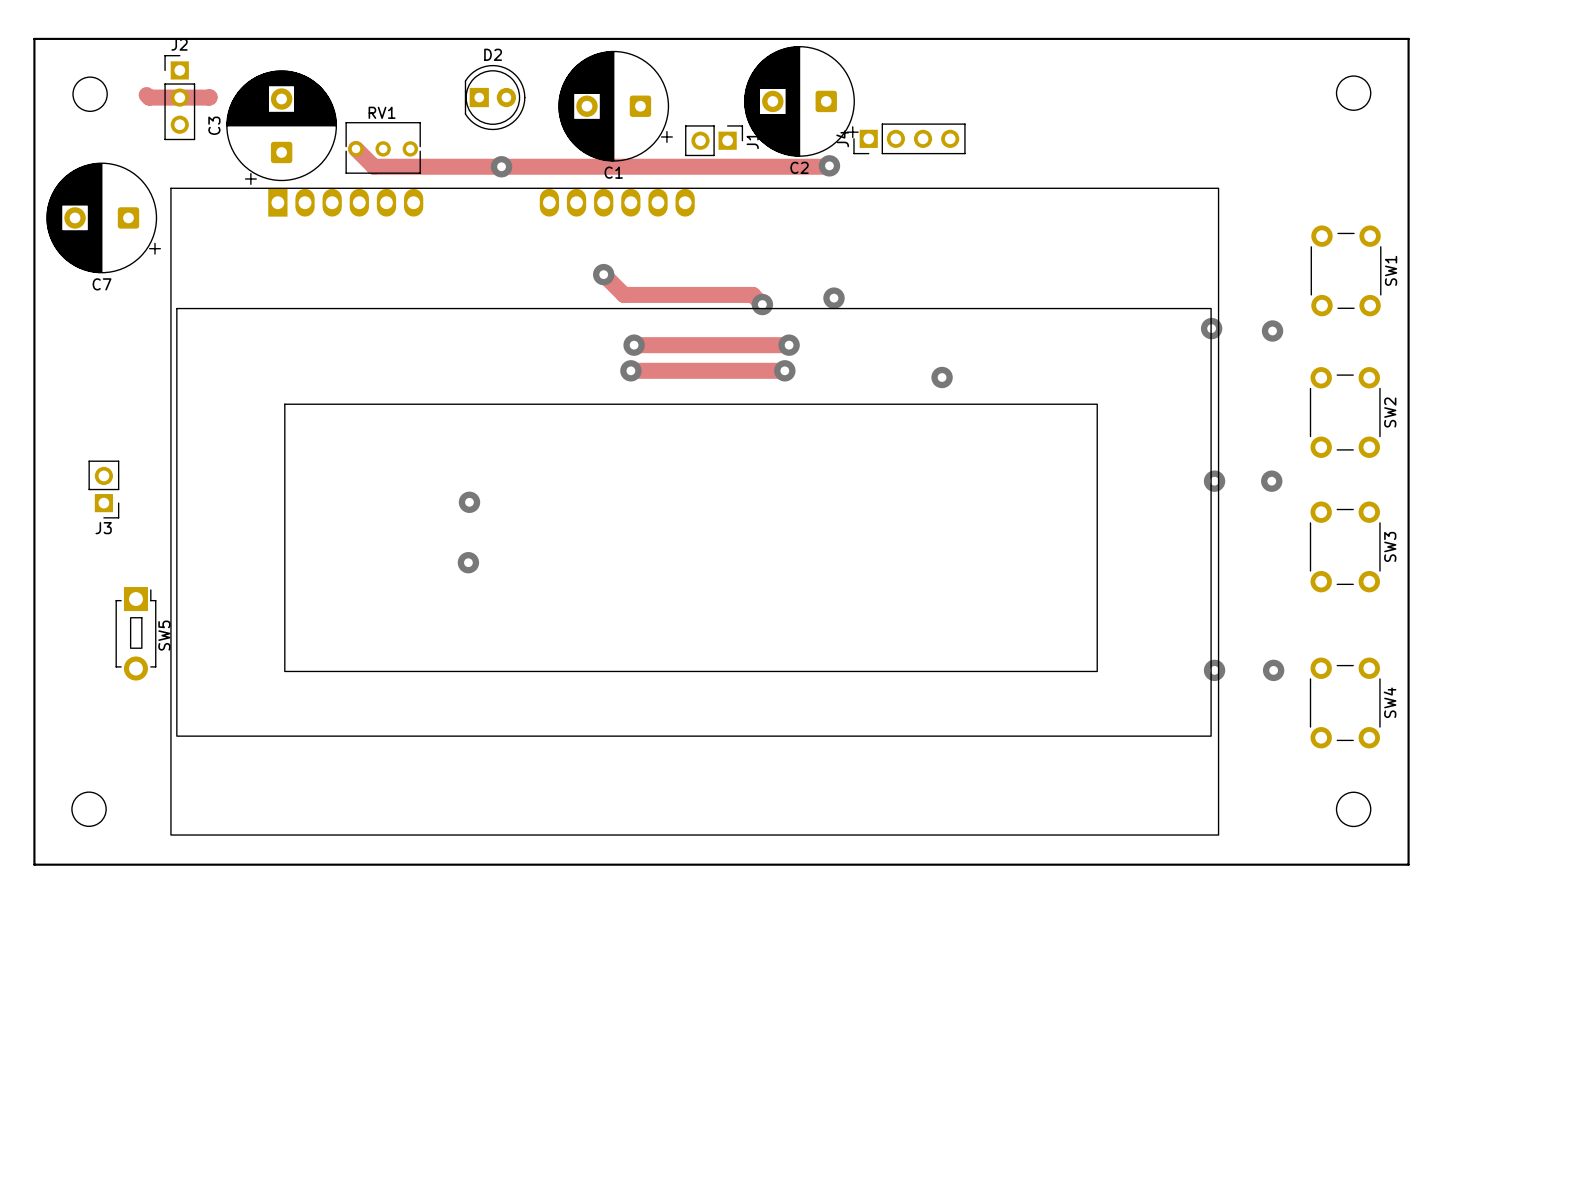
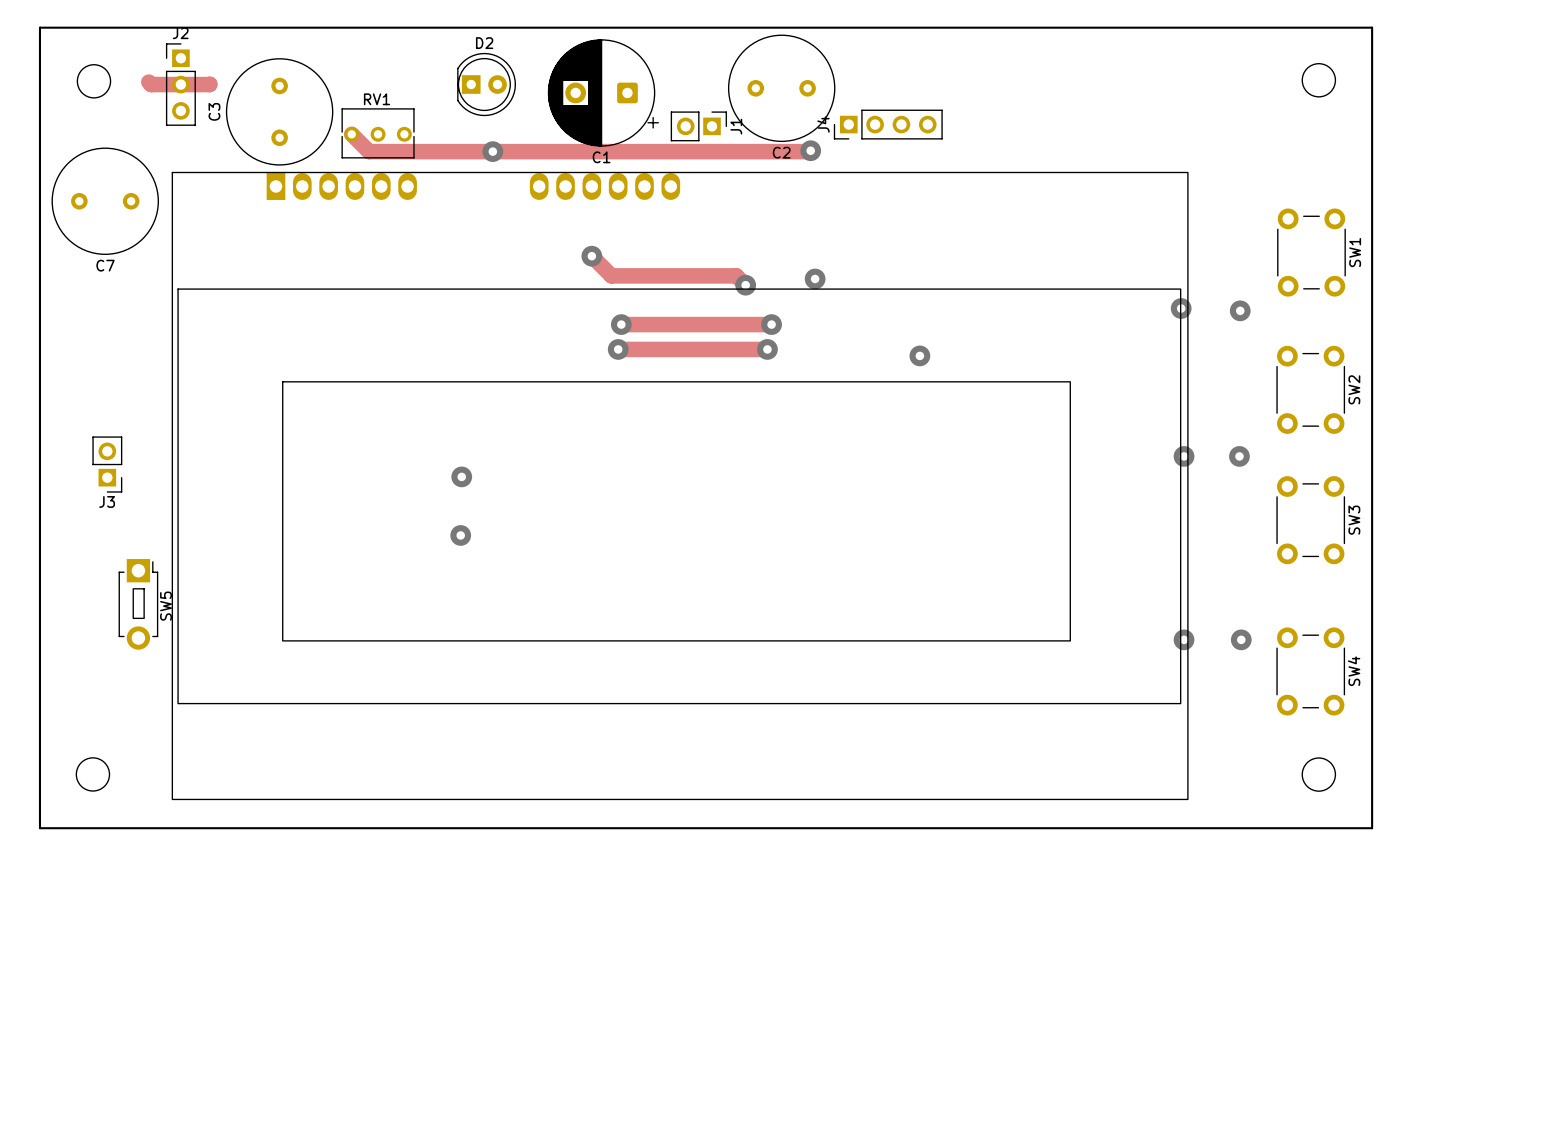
C2 footprint: [744, 46, 859, 157] -> [728, 34, 836, 142]
C3 footprint: [226, 70, 337, 185] -> [225, 58, 334, 166]
C7 footprint: [46, 162, 161, 274] -> [51, 147, 159, 255]

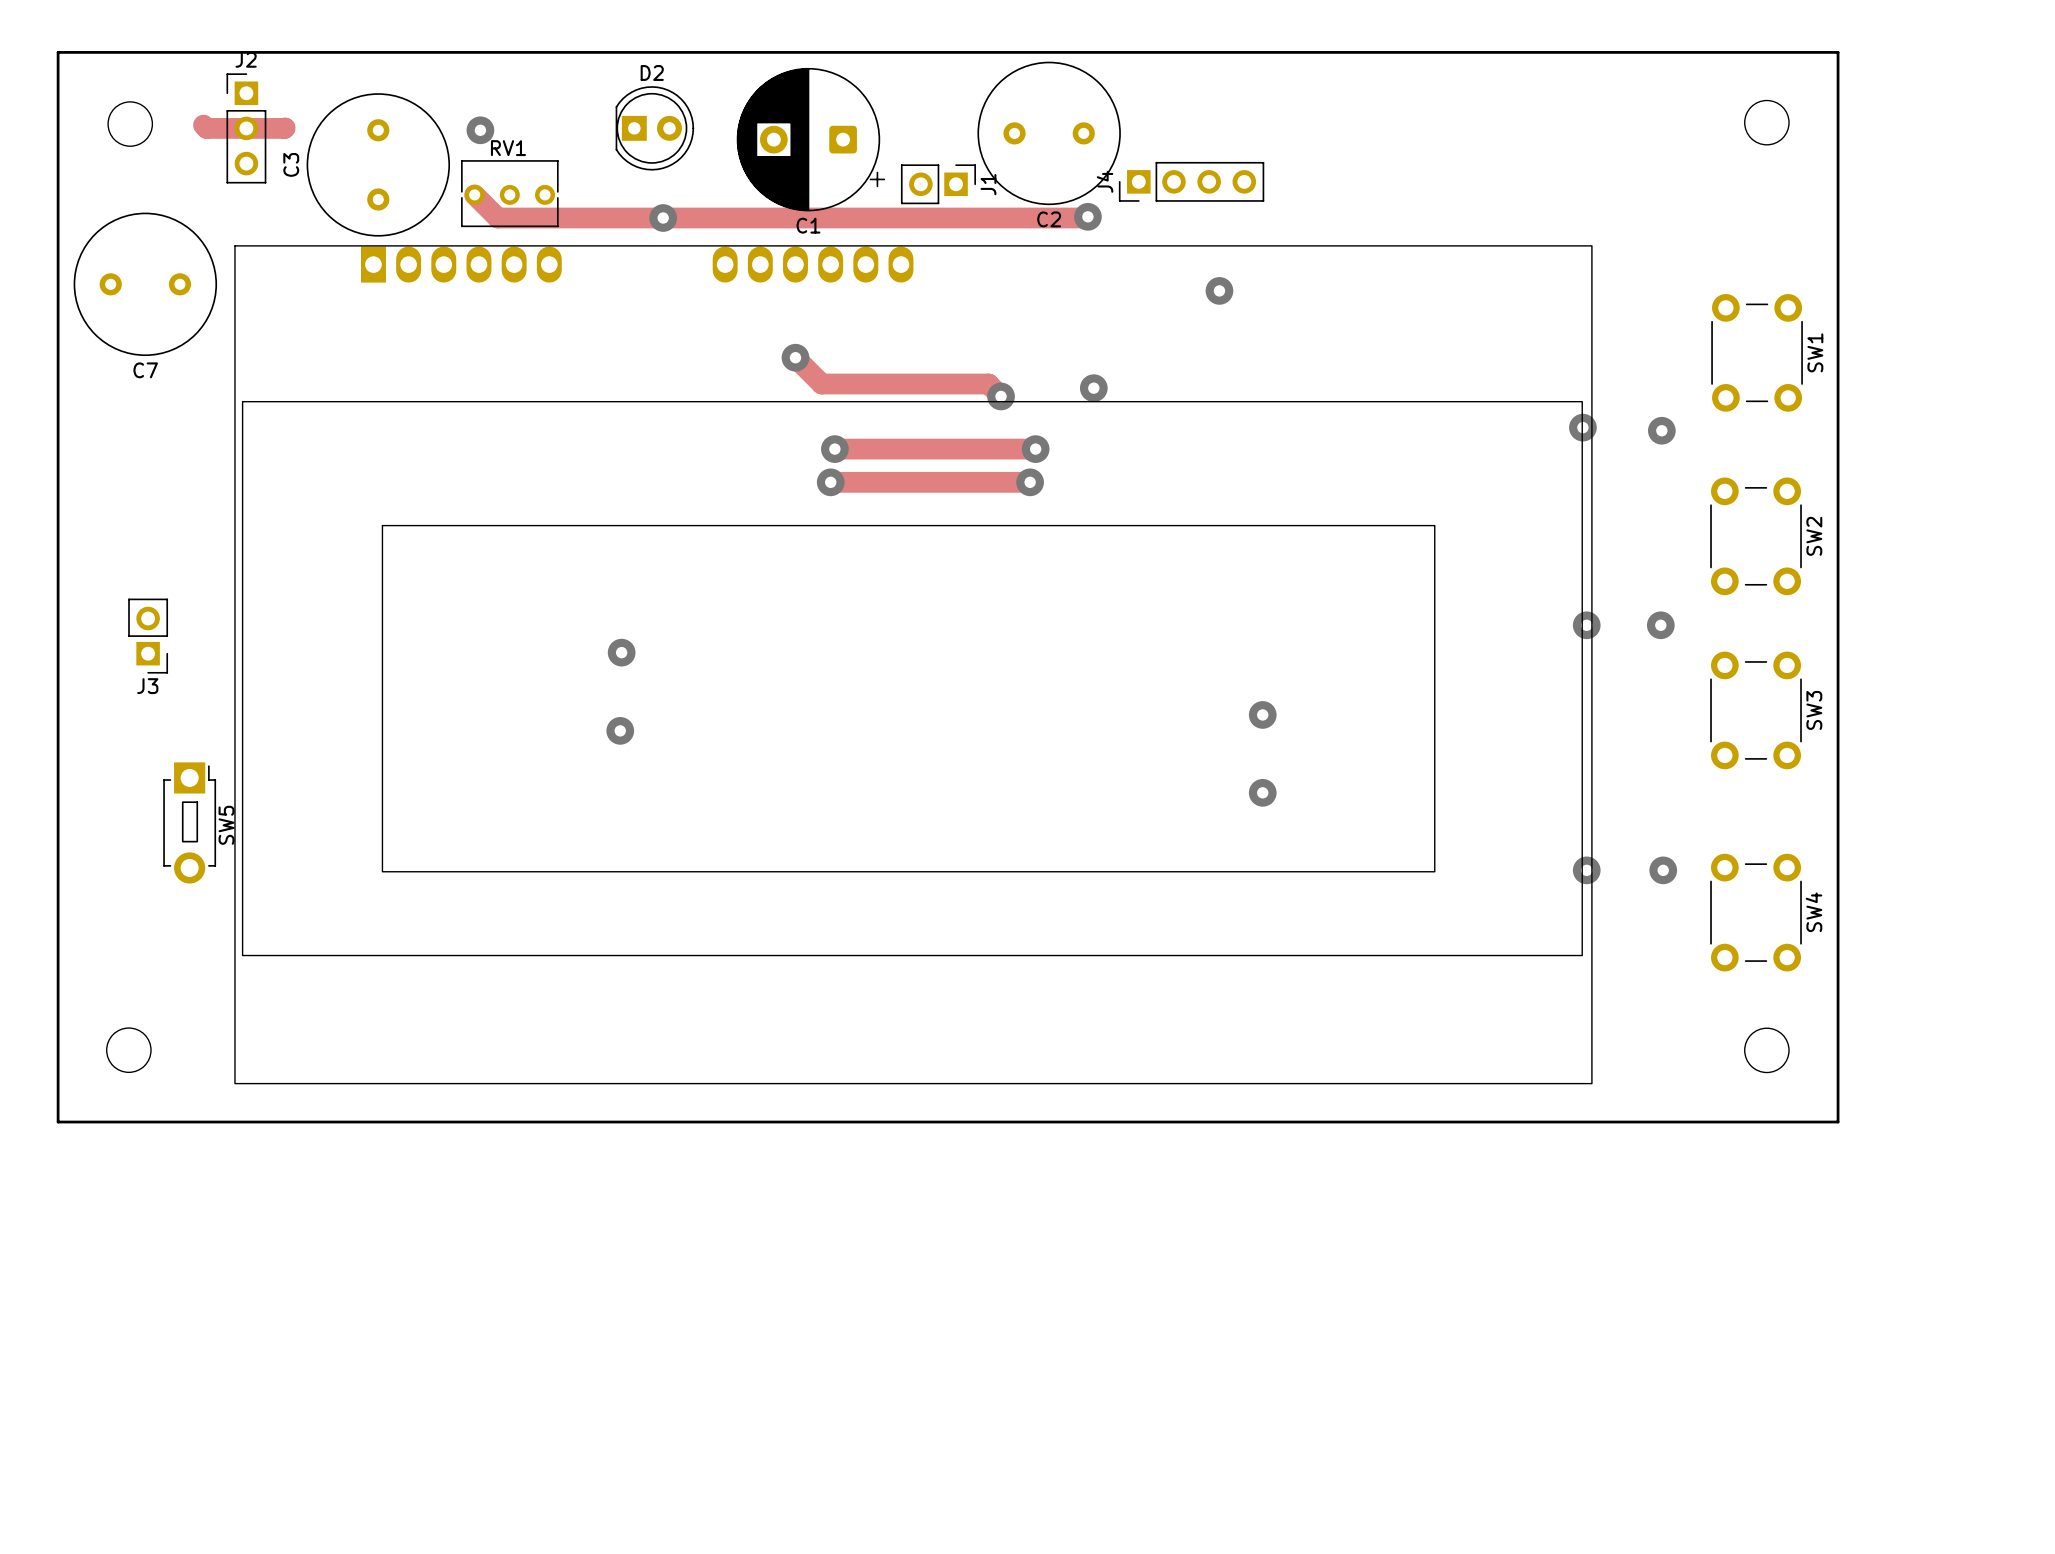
via: none -> (480, 130)
via: none -> (1219, 290)
via: (919, 355) -> none
via: none -> (1262, 714)
via: none -> (1262, 792)

